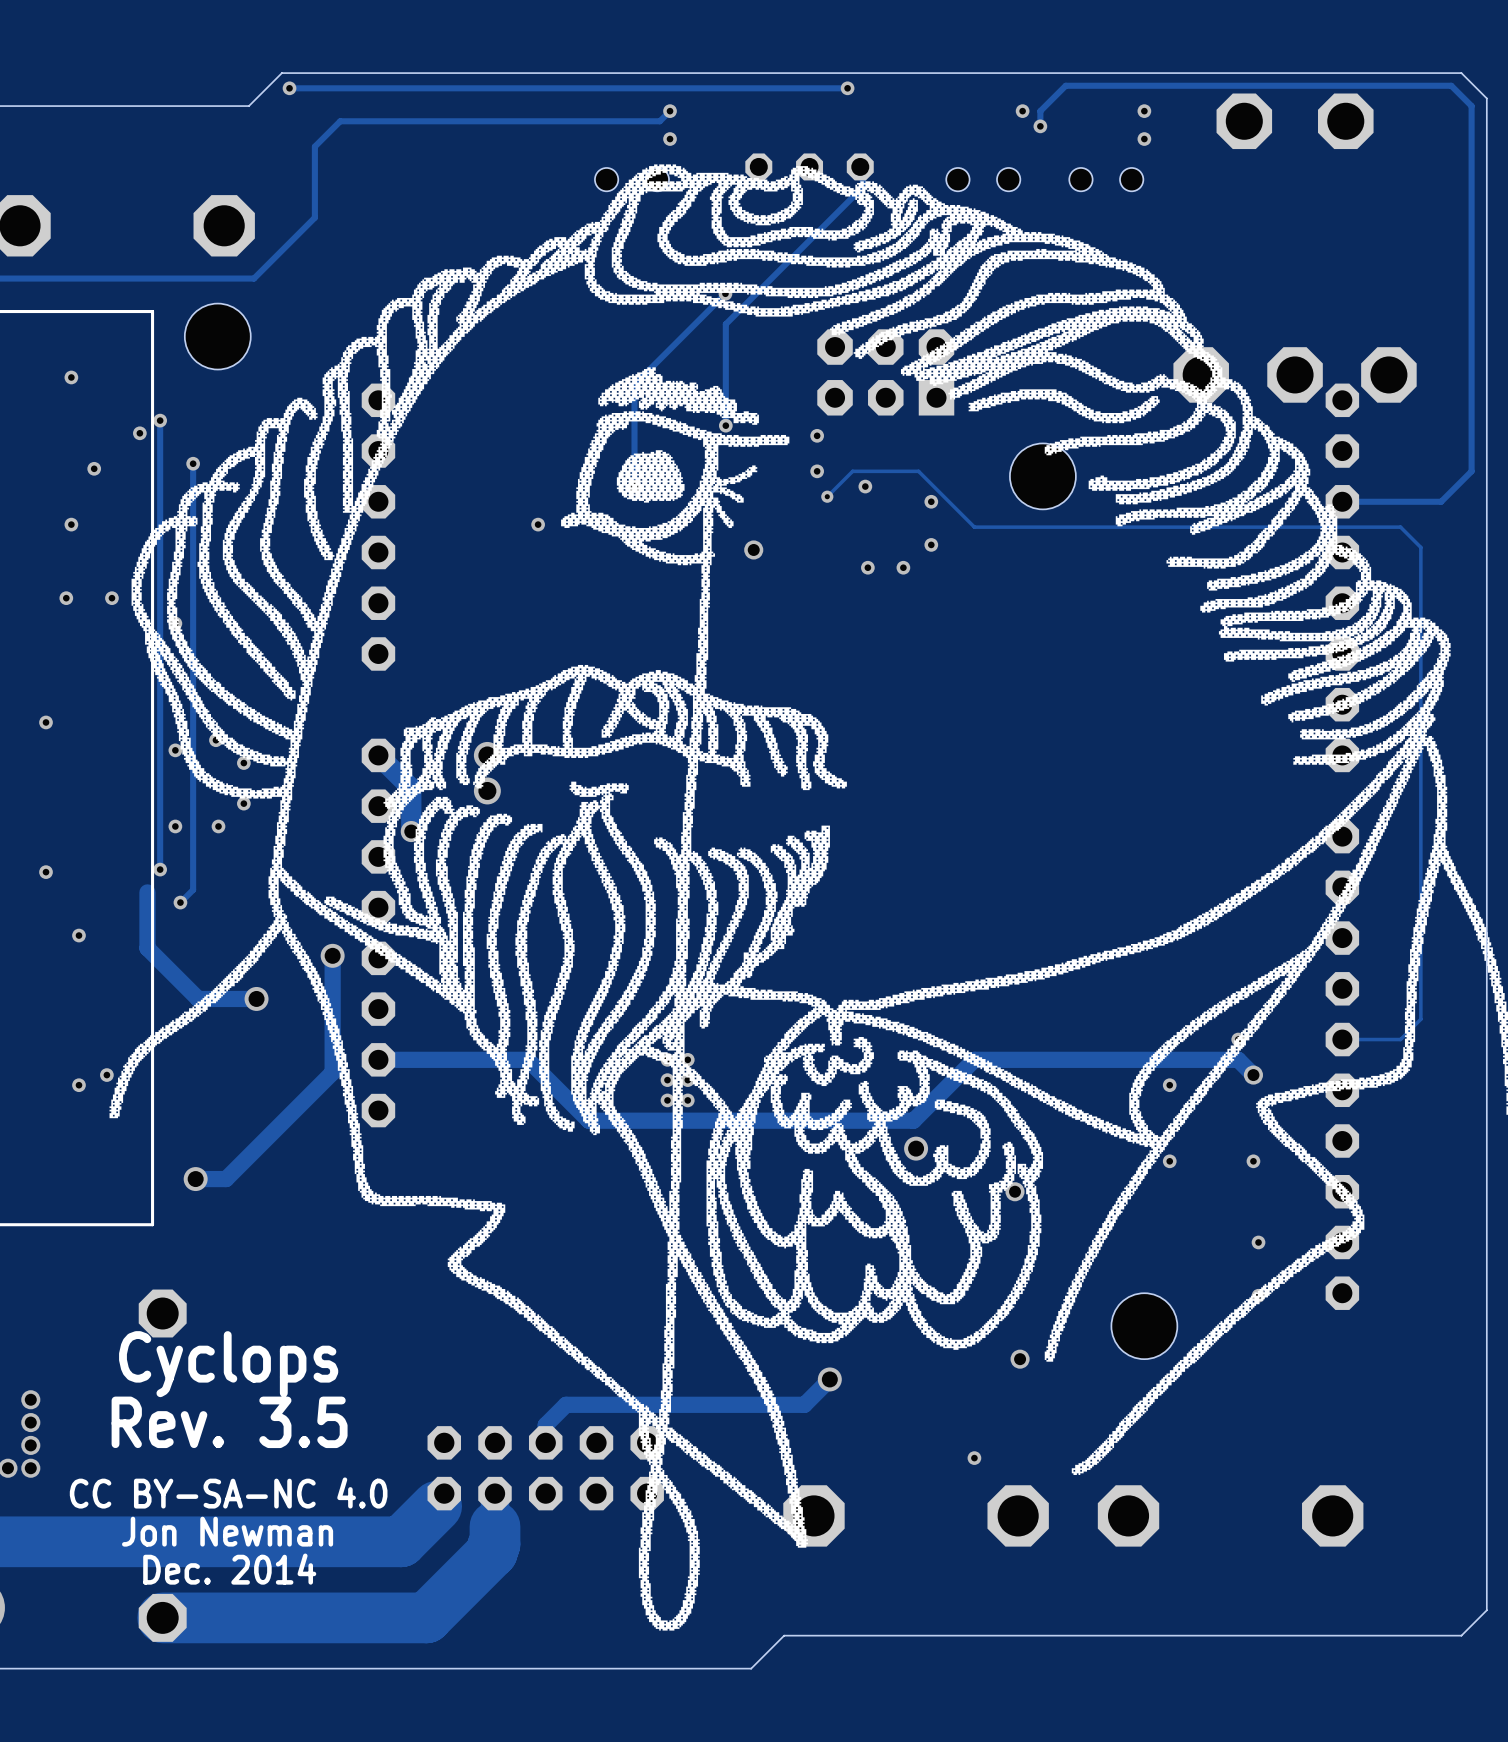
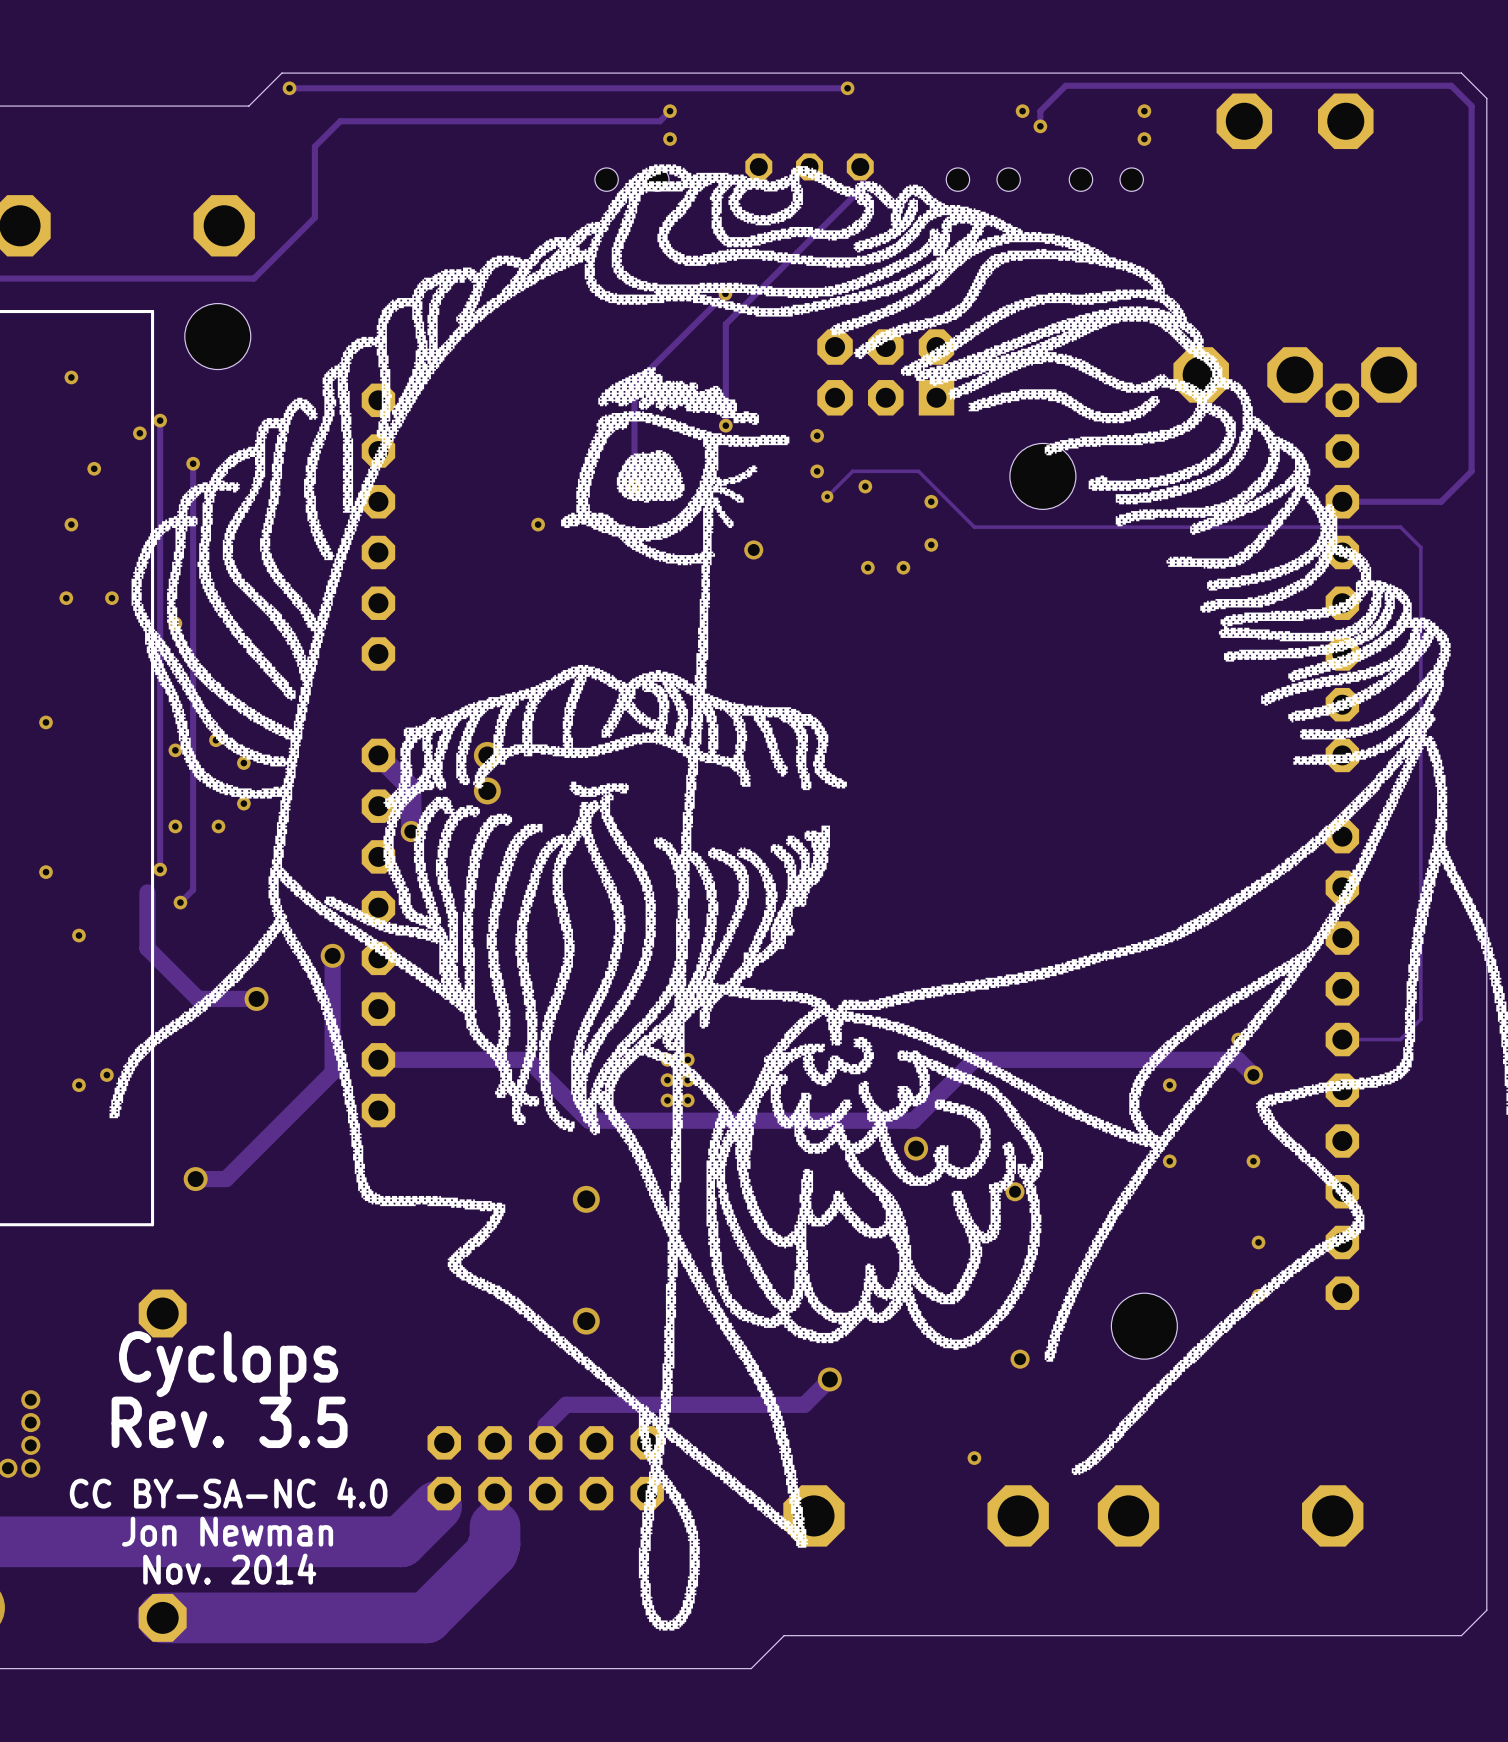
via: none -> (586, 1199)
via: none -> (586, 1321)
text: Dec. 2014 (229, 1569) -> Nov. 2014 (229, 1569)

